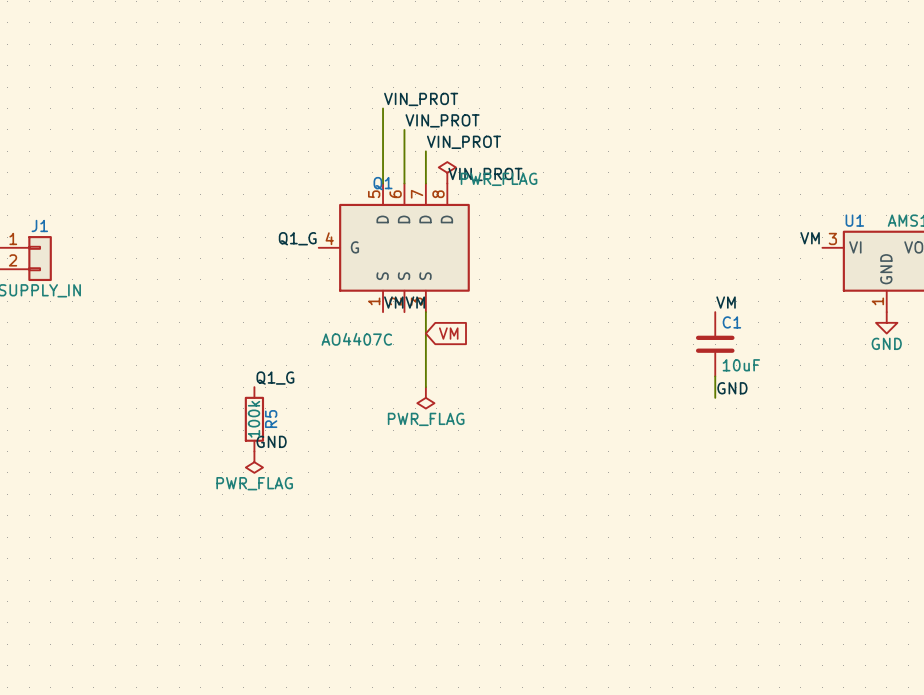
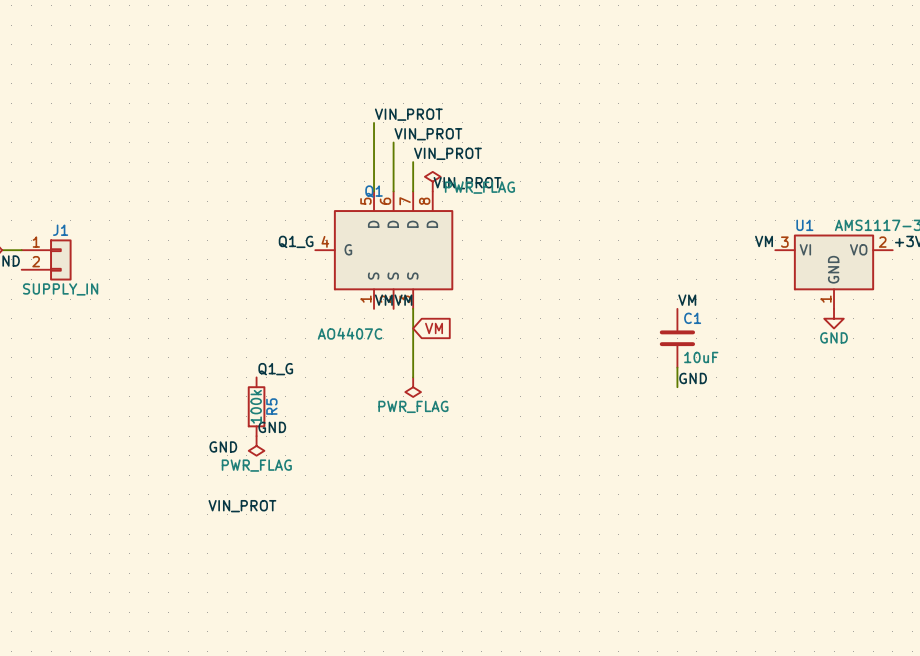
label: none -> GND (223, 446)
label: none -> VIN_PROT (242, 506)

